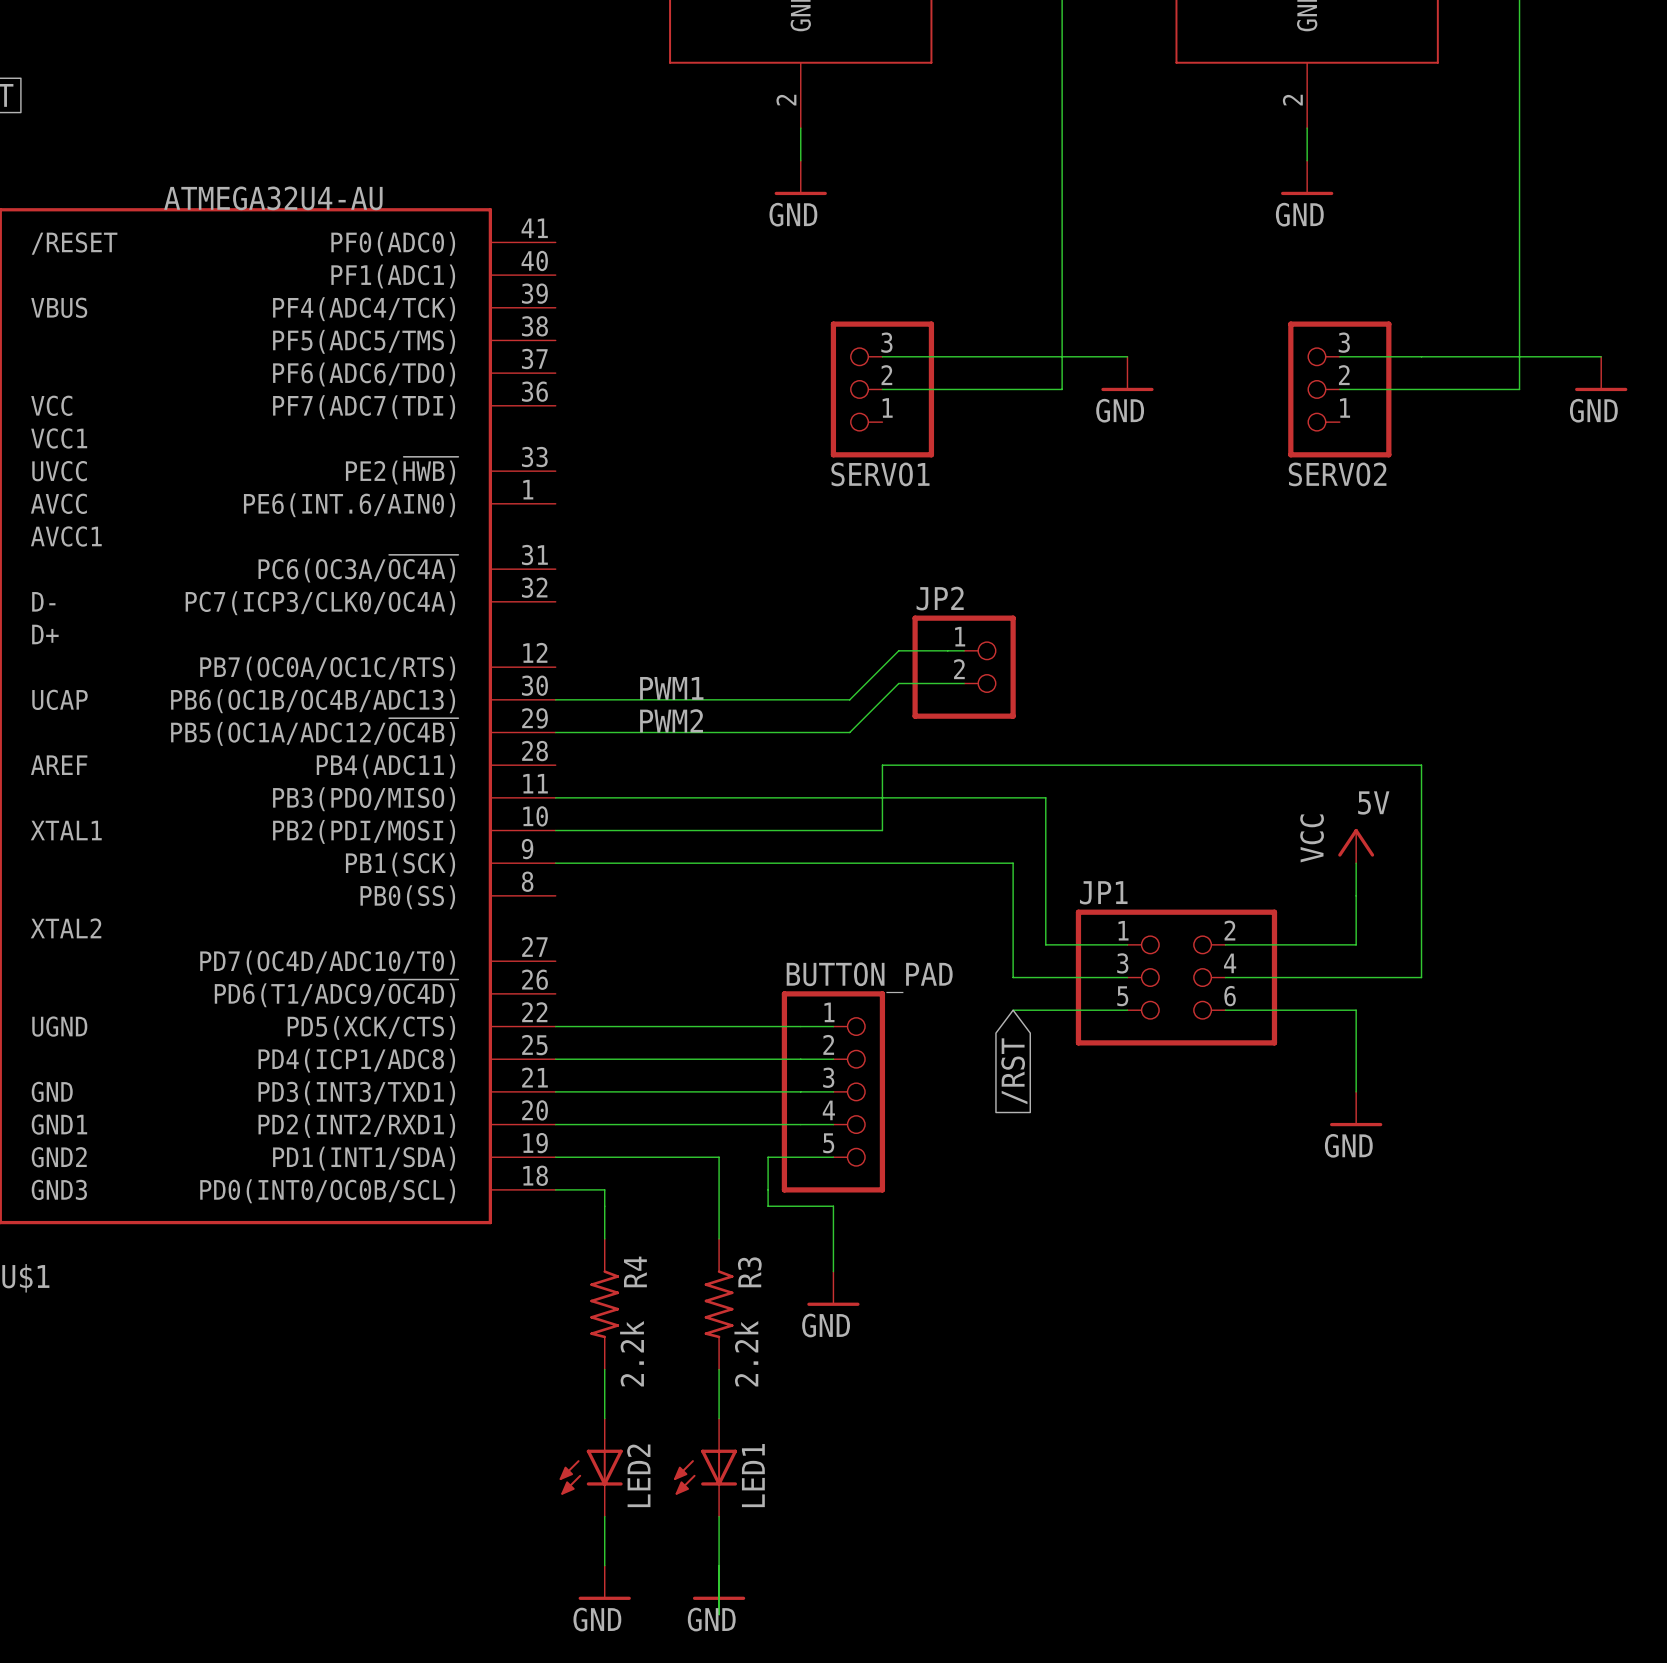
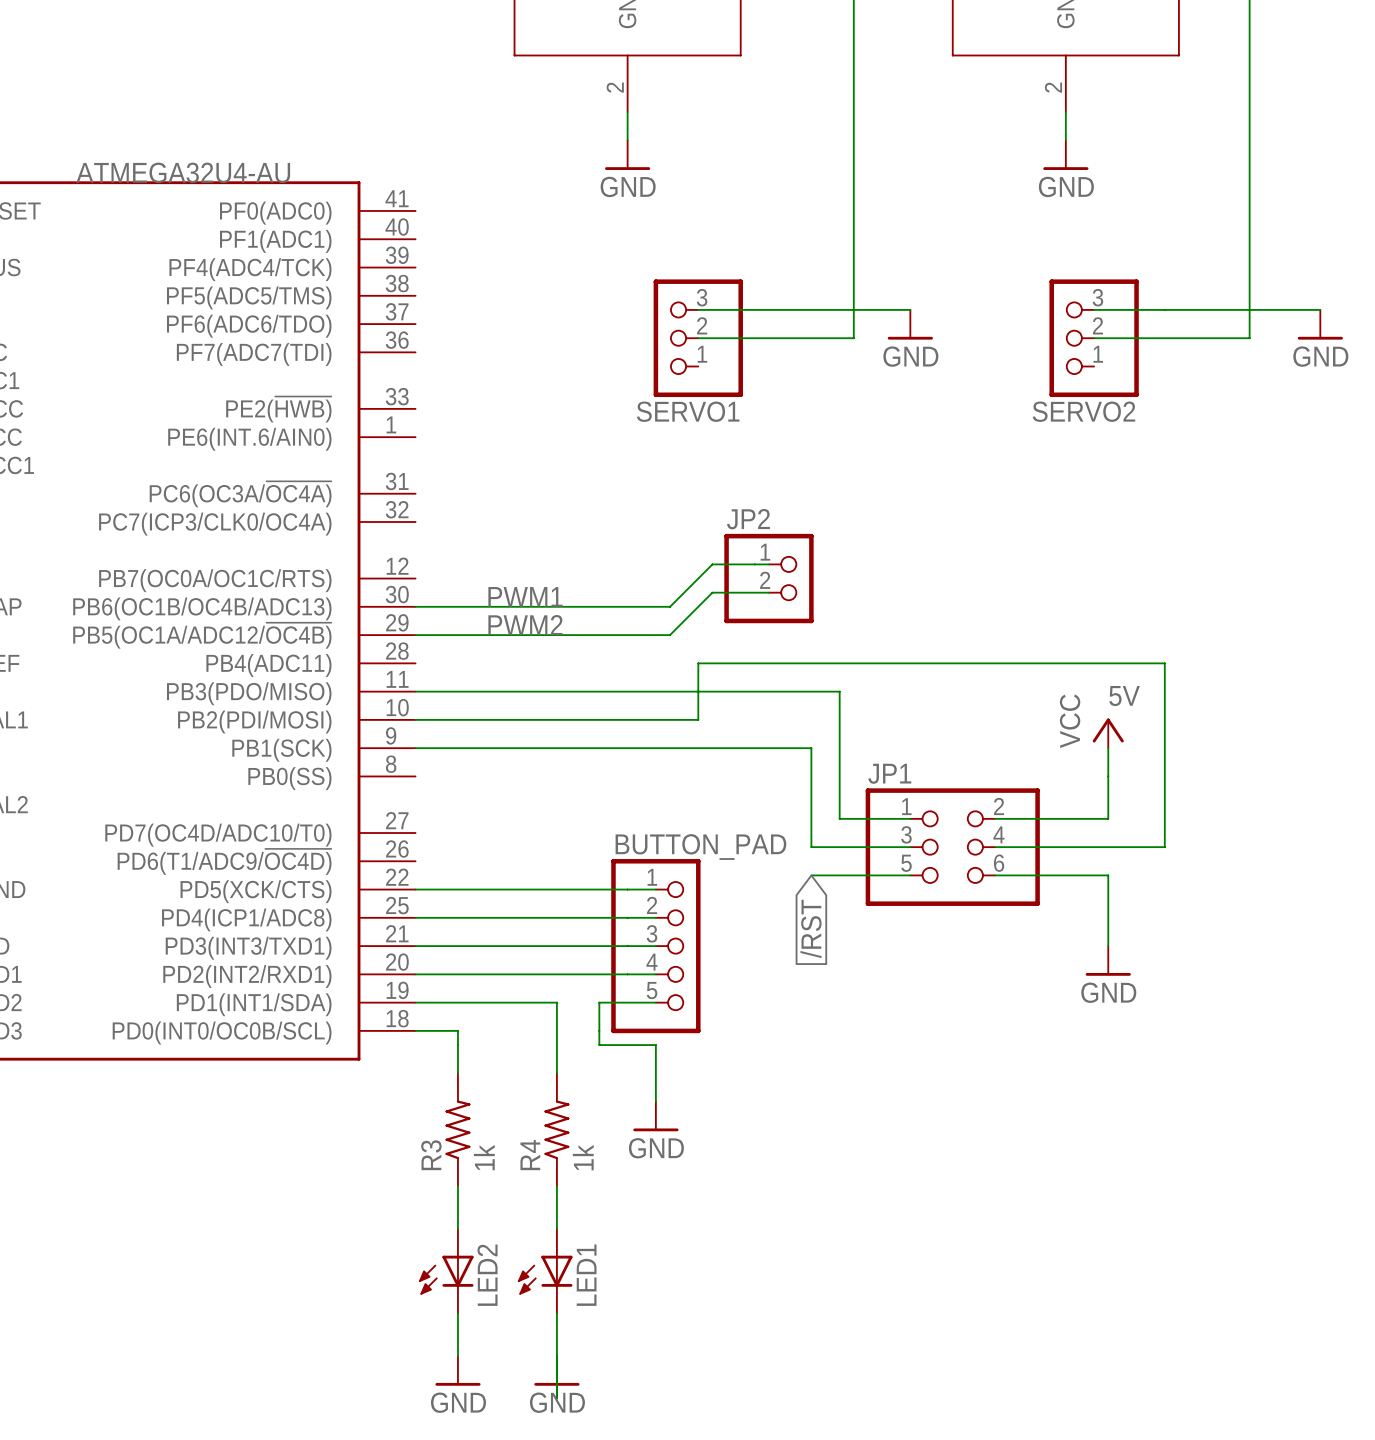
R4 rotation: 0° (604, 1304) -> 180° (556, 1129)
R4 position: (604, 1304) -> (556, 1129)
R3 rotation: 0° (719, 1304) -> 180° (457, 1129)
R3 position: (719, 1304) -> (457, 1129)
R3 value: none -> 1k (484, 1157)
R4 value: none -> 1k (583, 1157)
R4 text: 2.2k (632, 1353) -> none
R3 text: 2.2k (746, 1353) -> none

